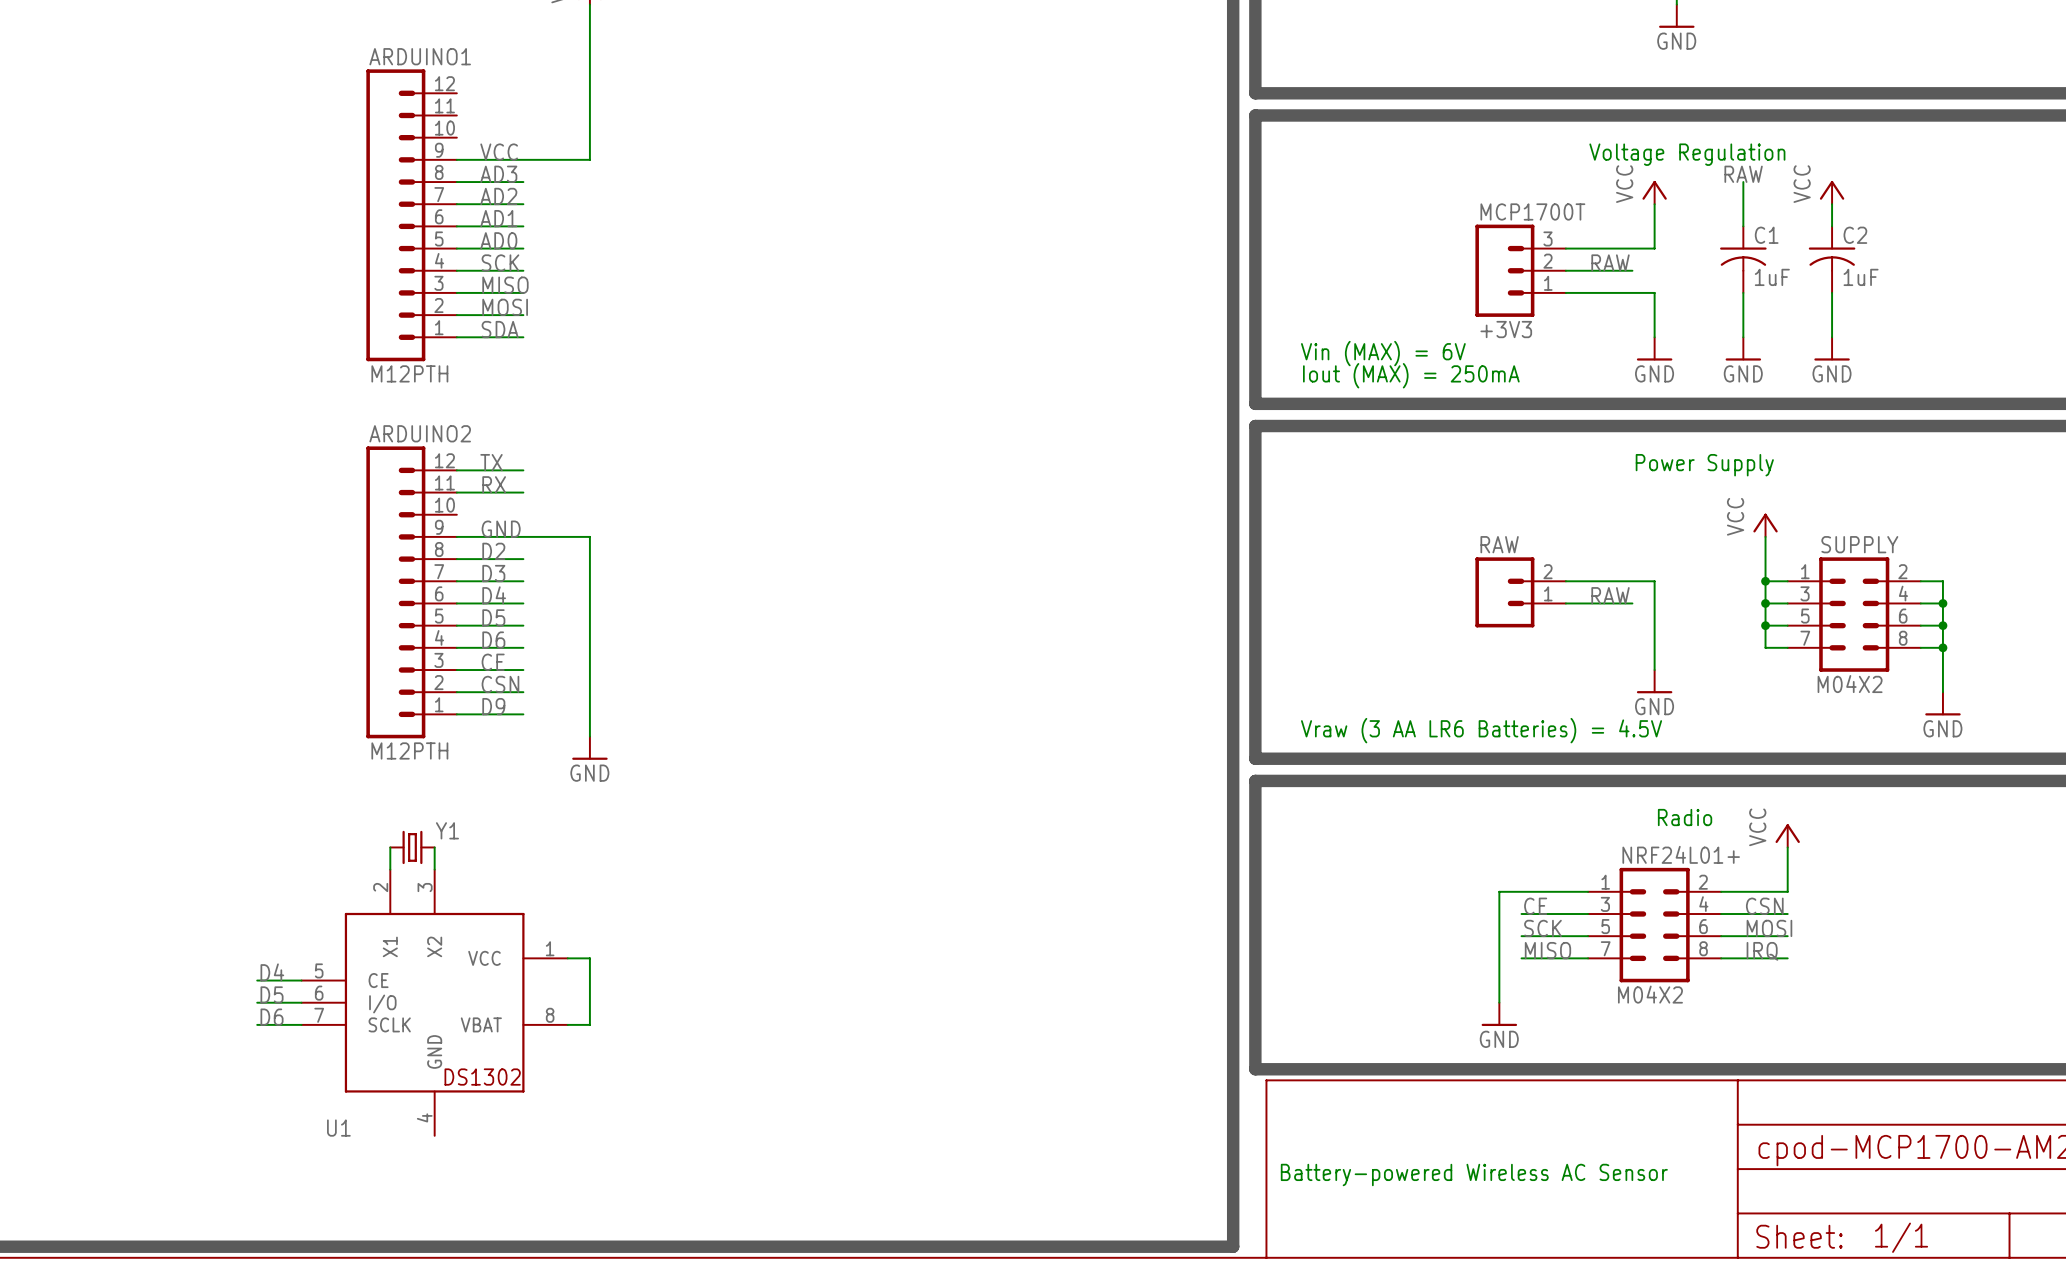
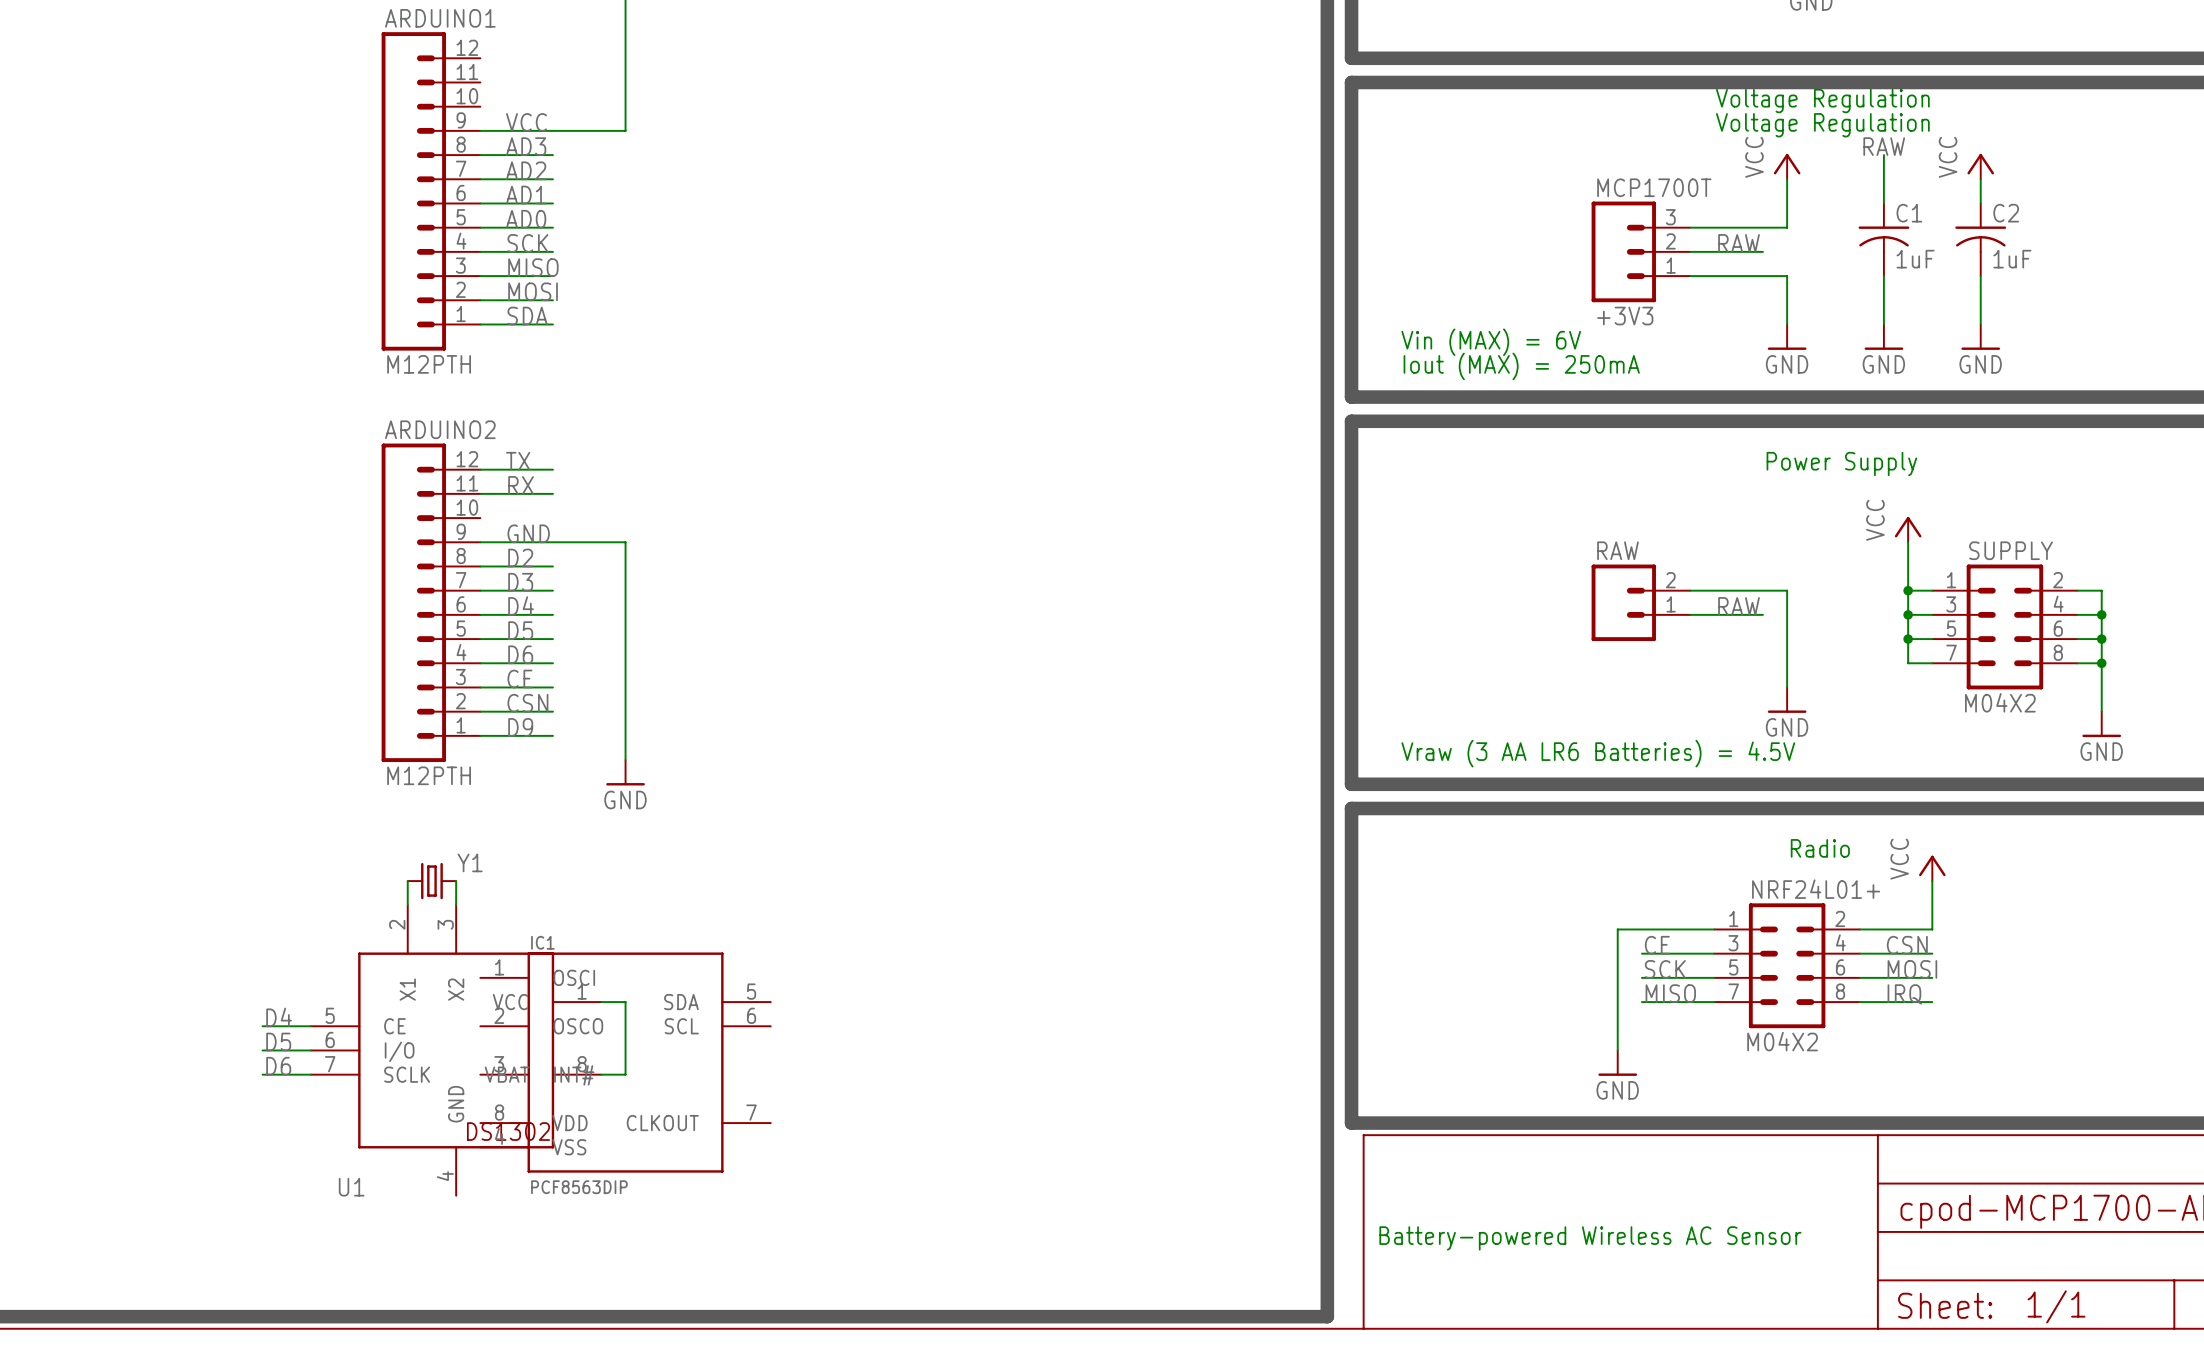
text: none -> Voltage Regulation (1822, 101)
IC1: none -> PCF8563DIP (625, 1062)

